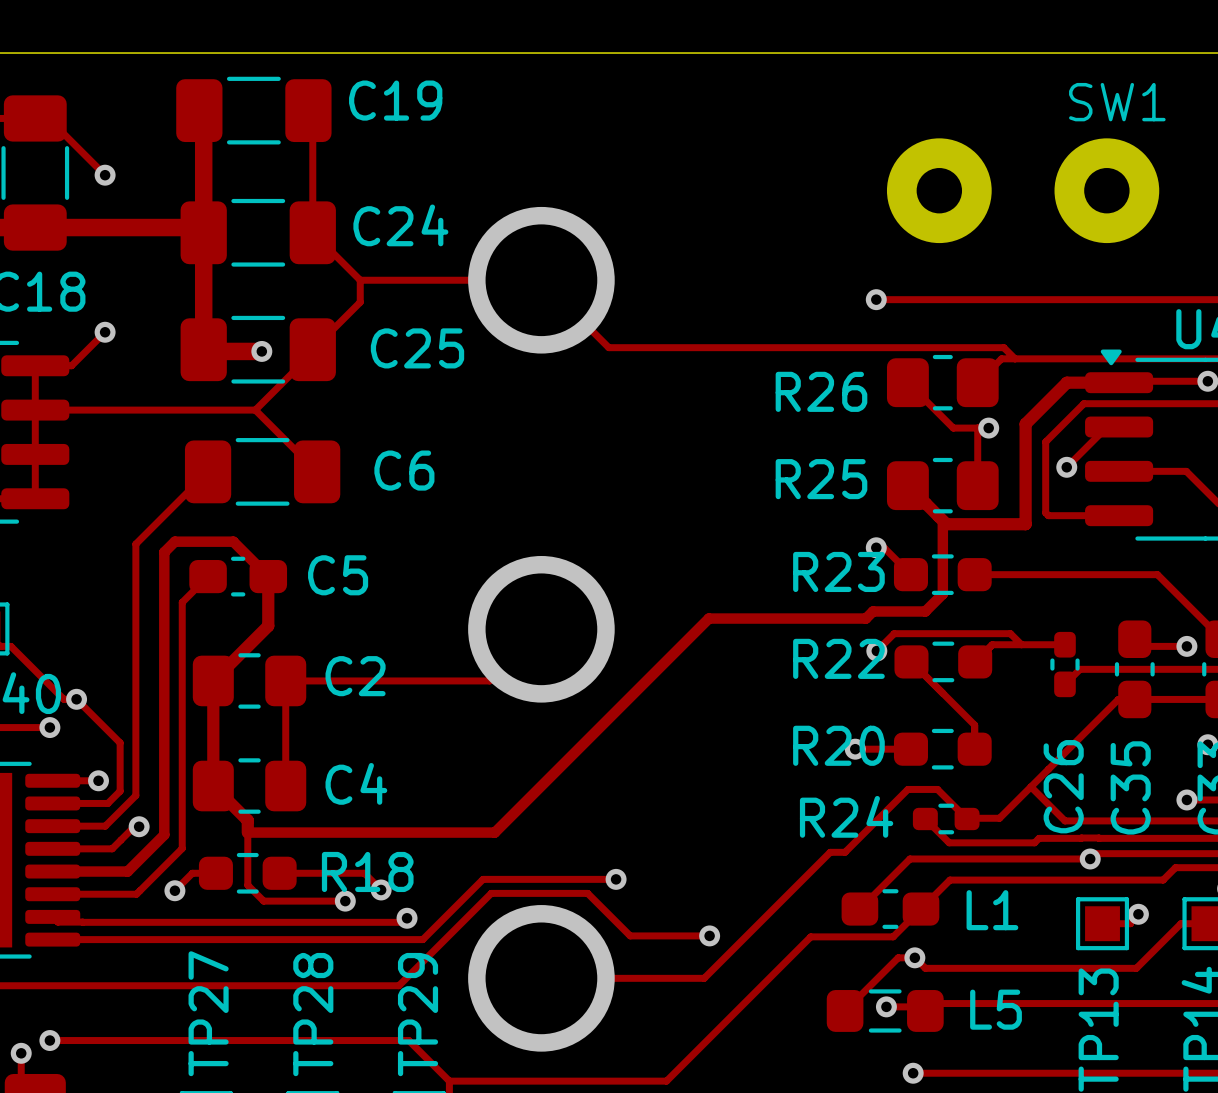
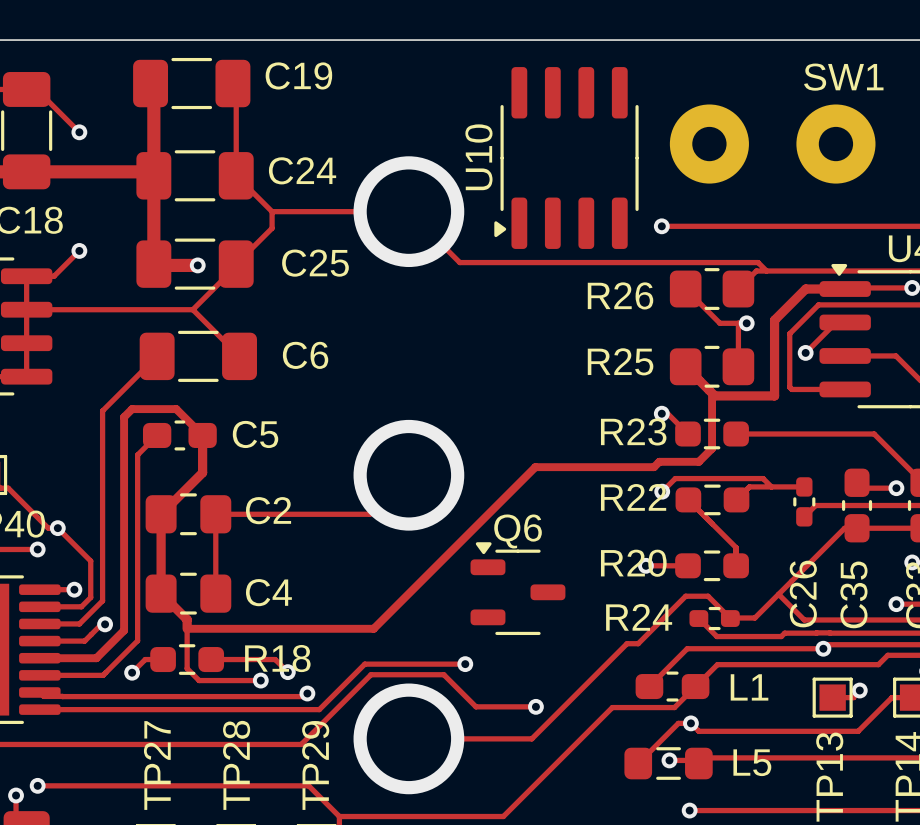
U10: none -> (566, 158)
Q6: none -> (517, 588)

